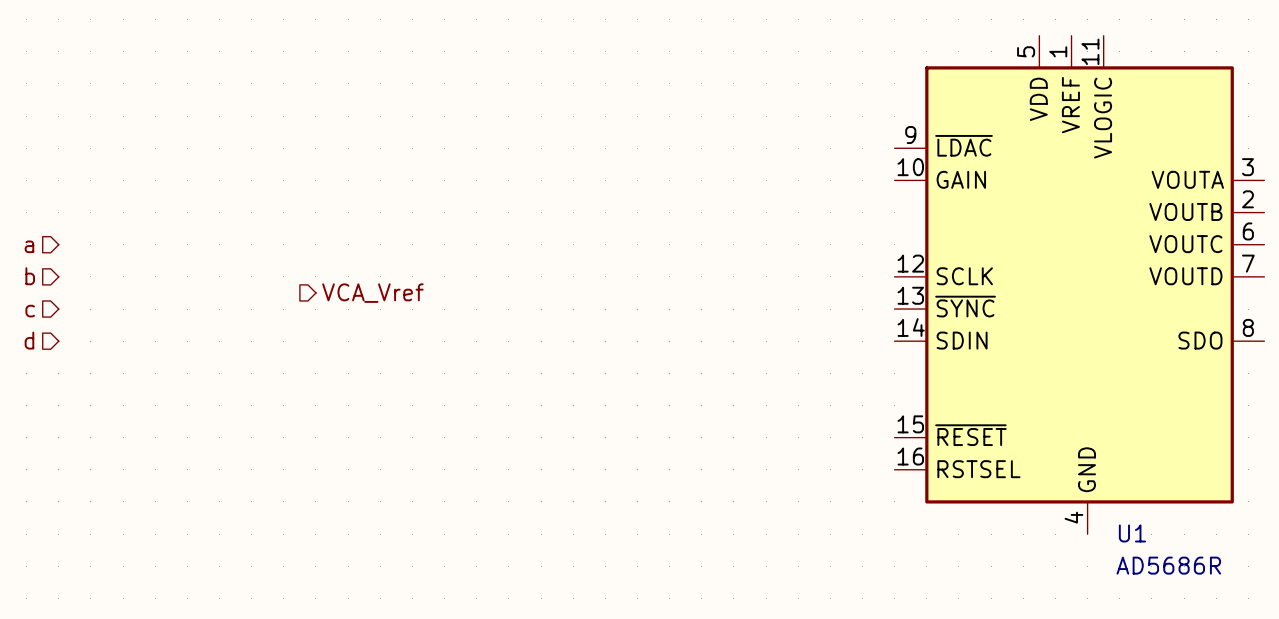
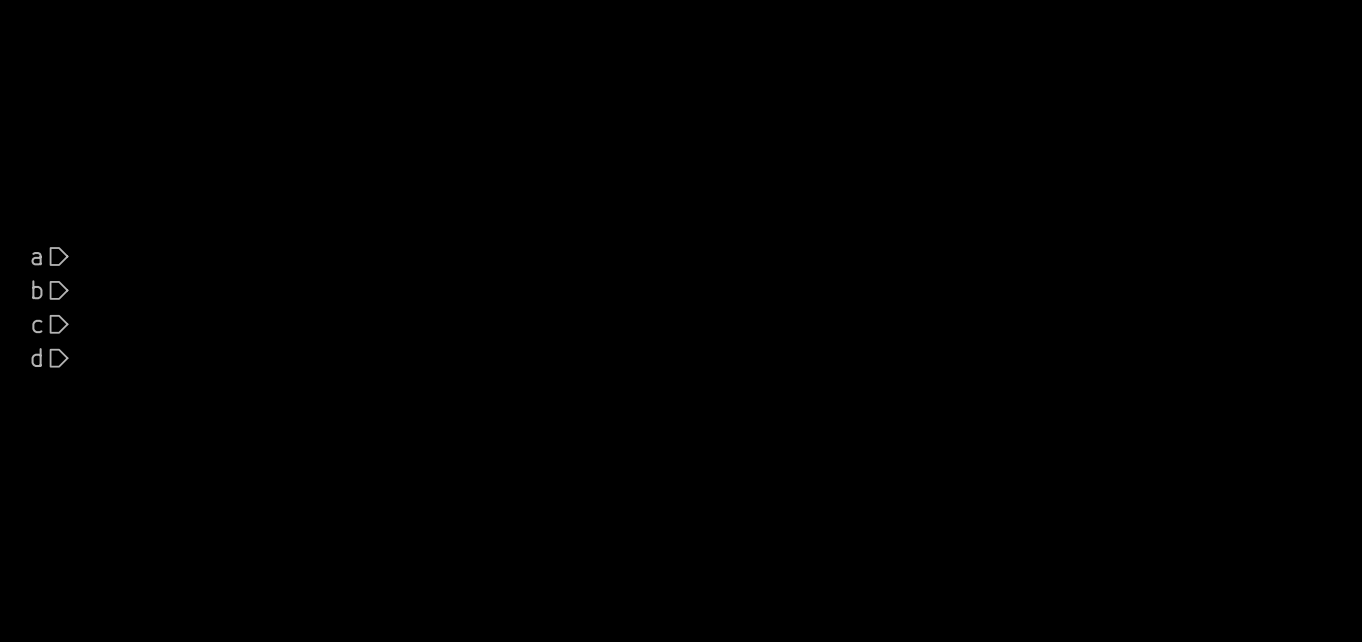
U1: AD5686R (1079, 284) -> none
hierarchical label: VCA_Vref (372, 293) -> none

